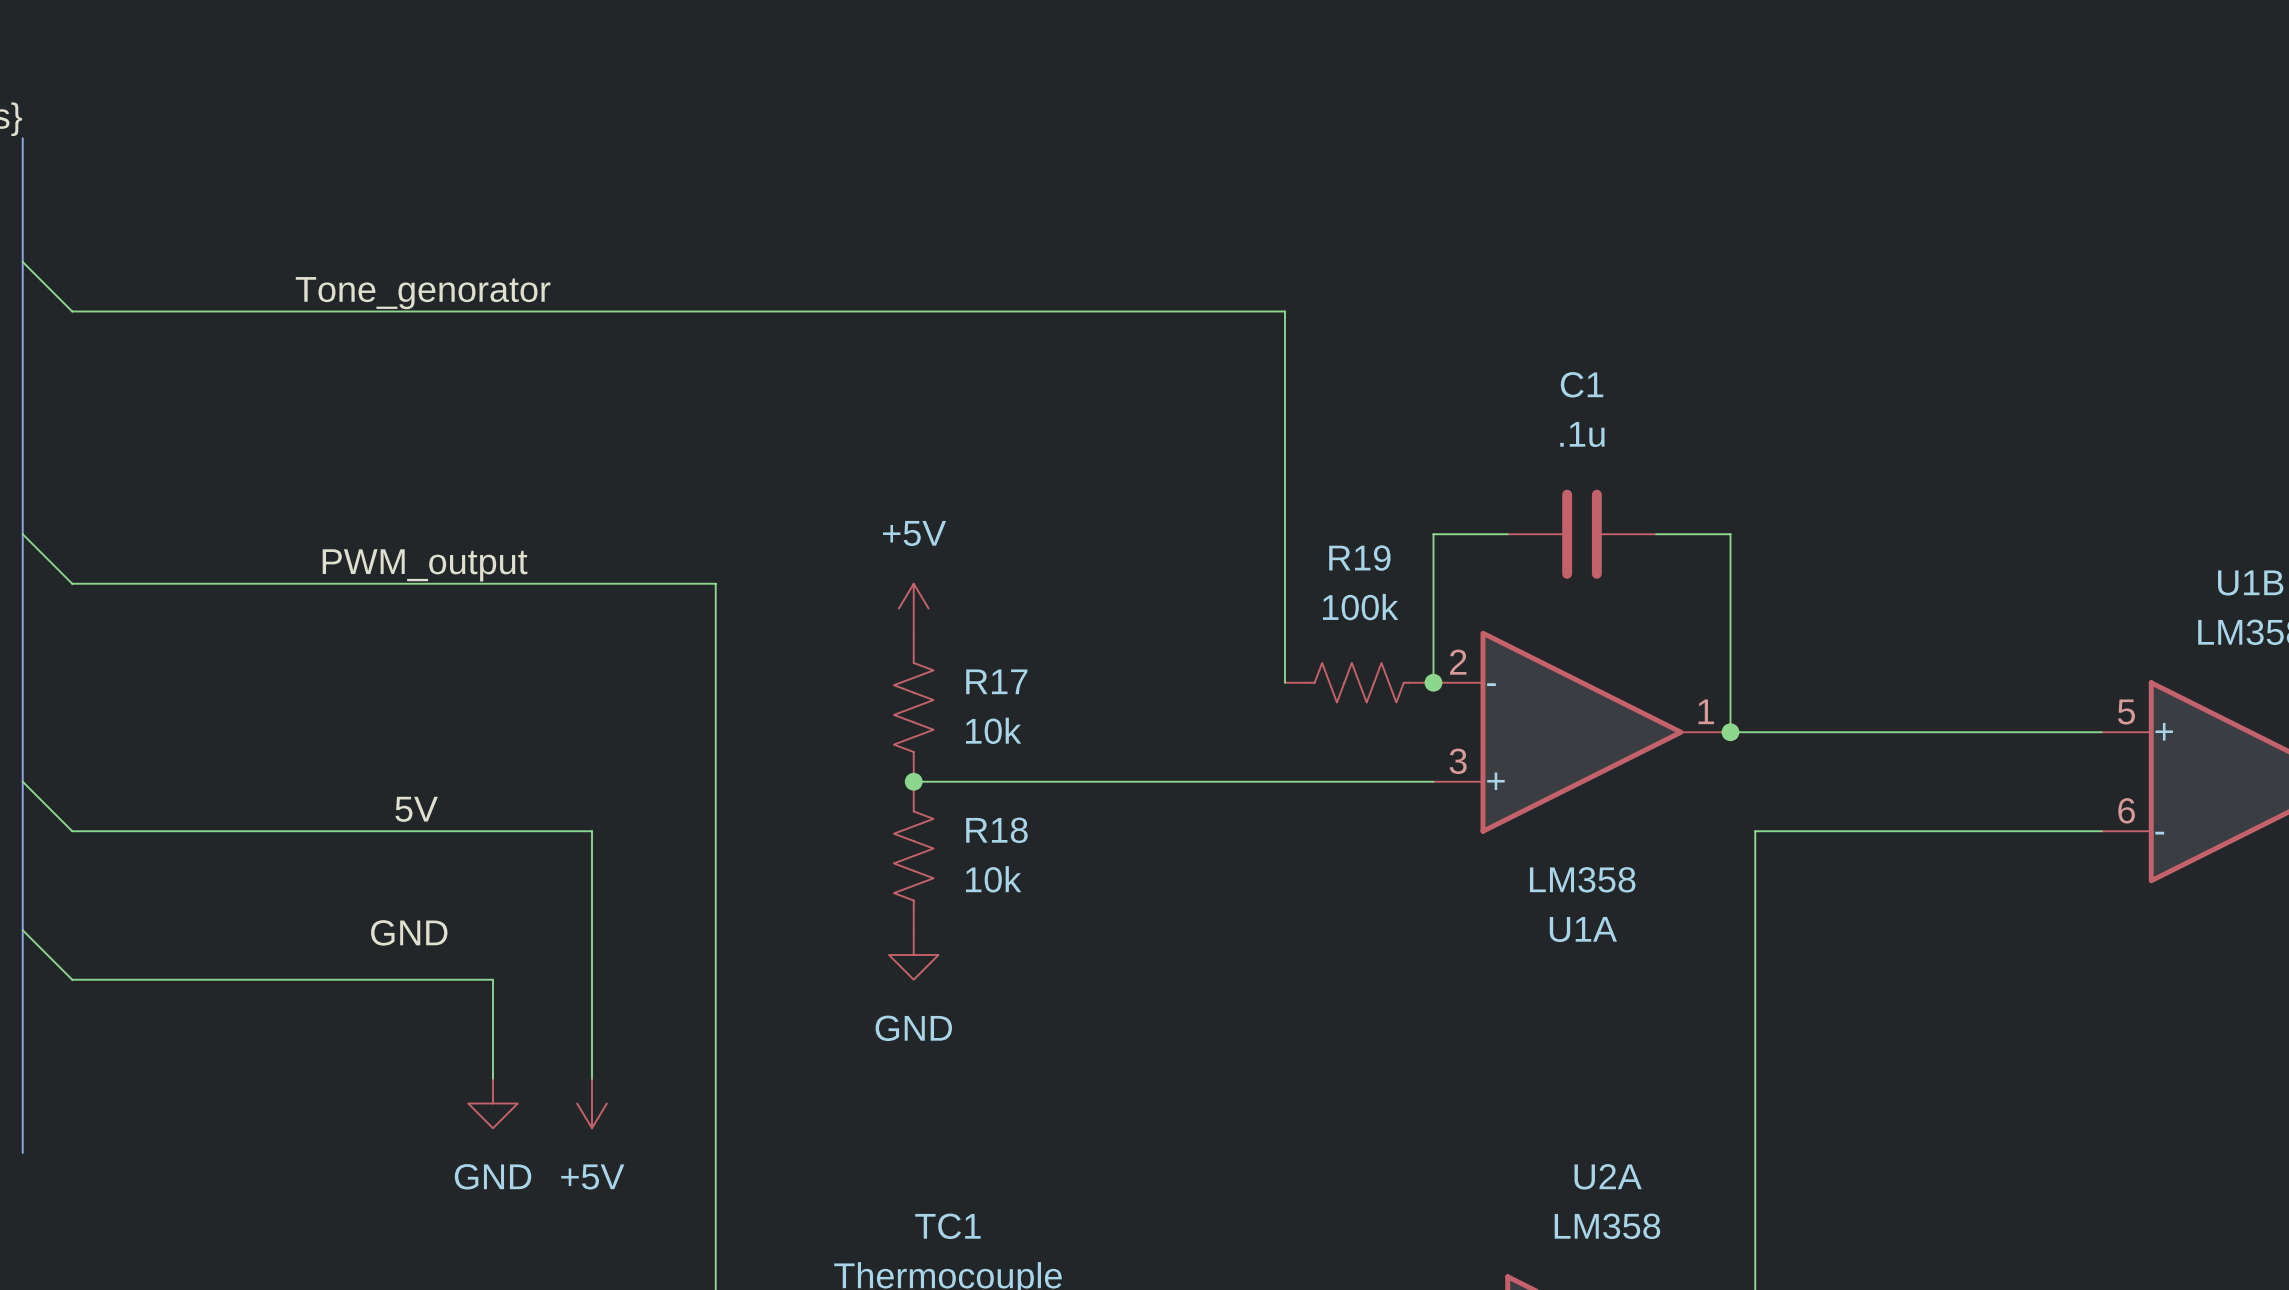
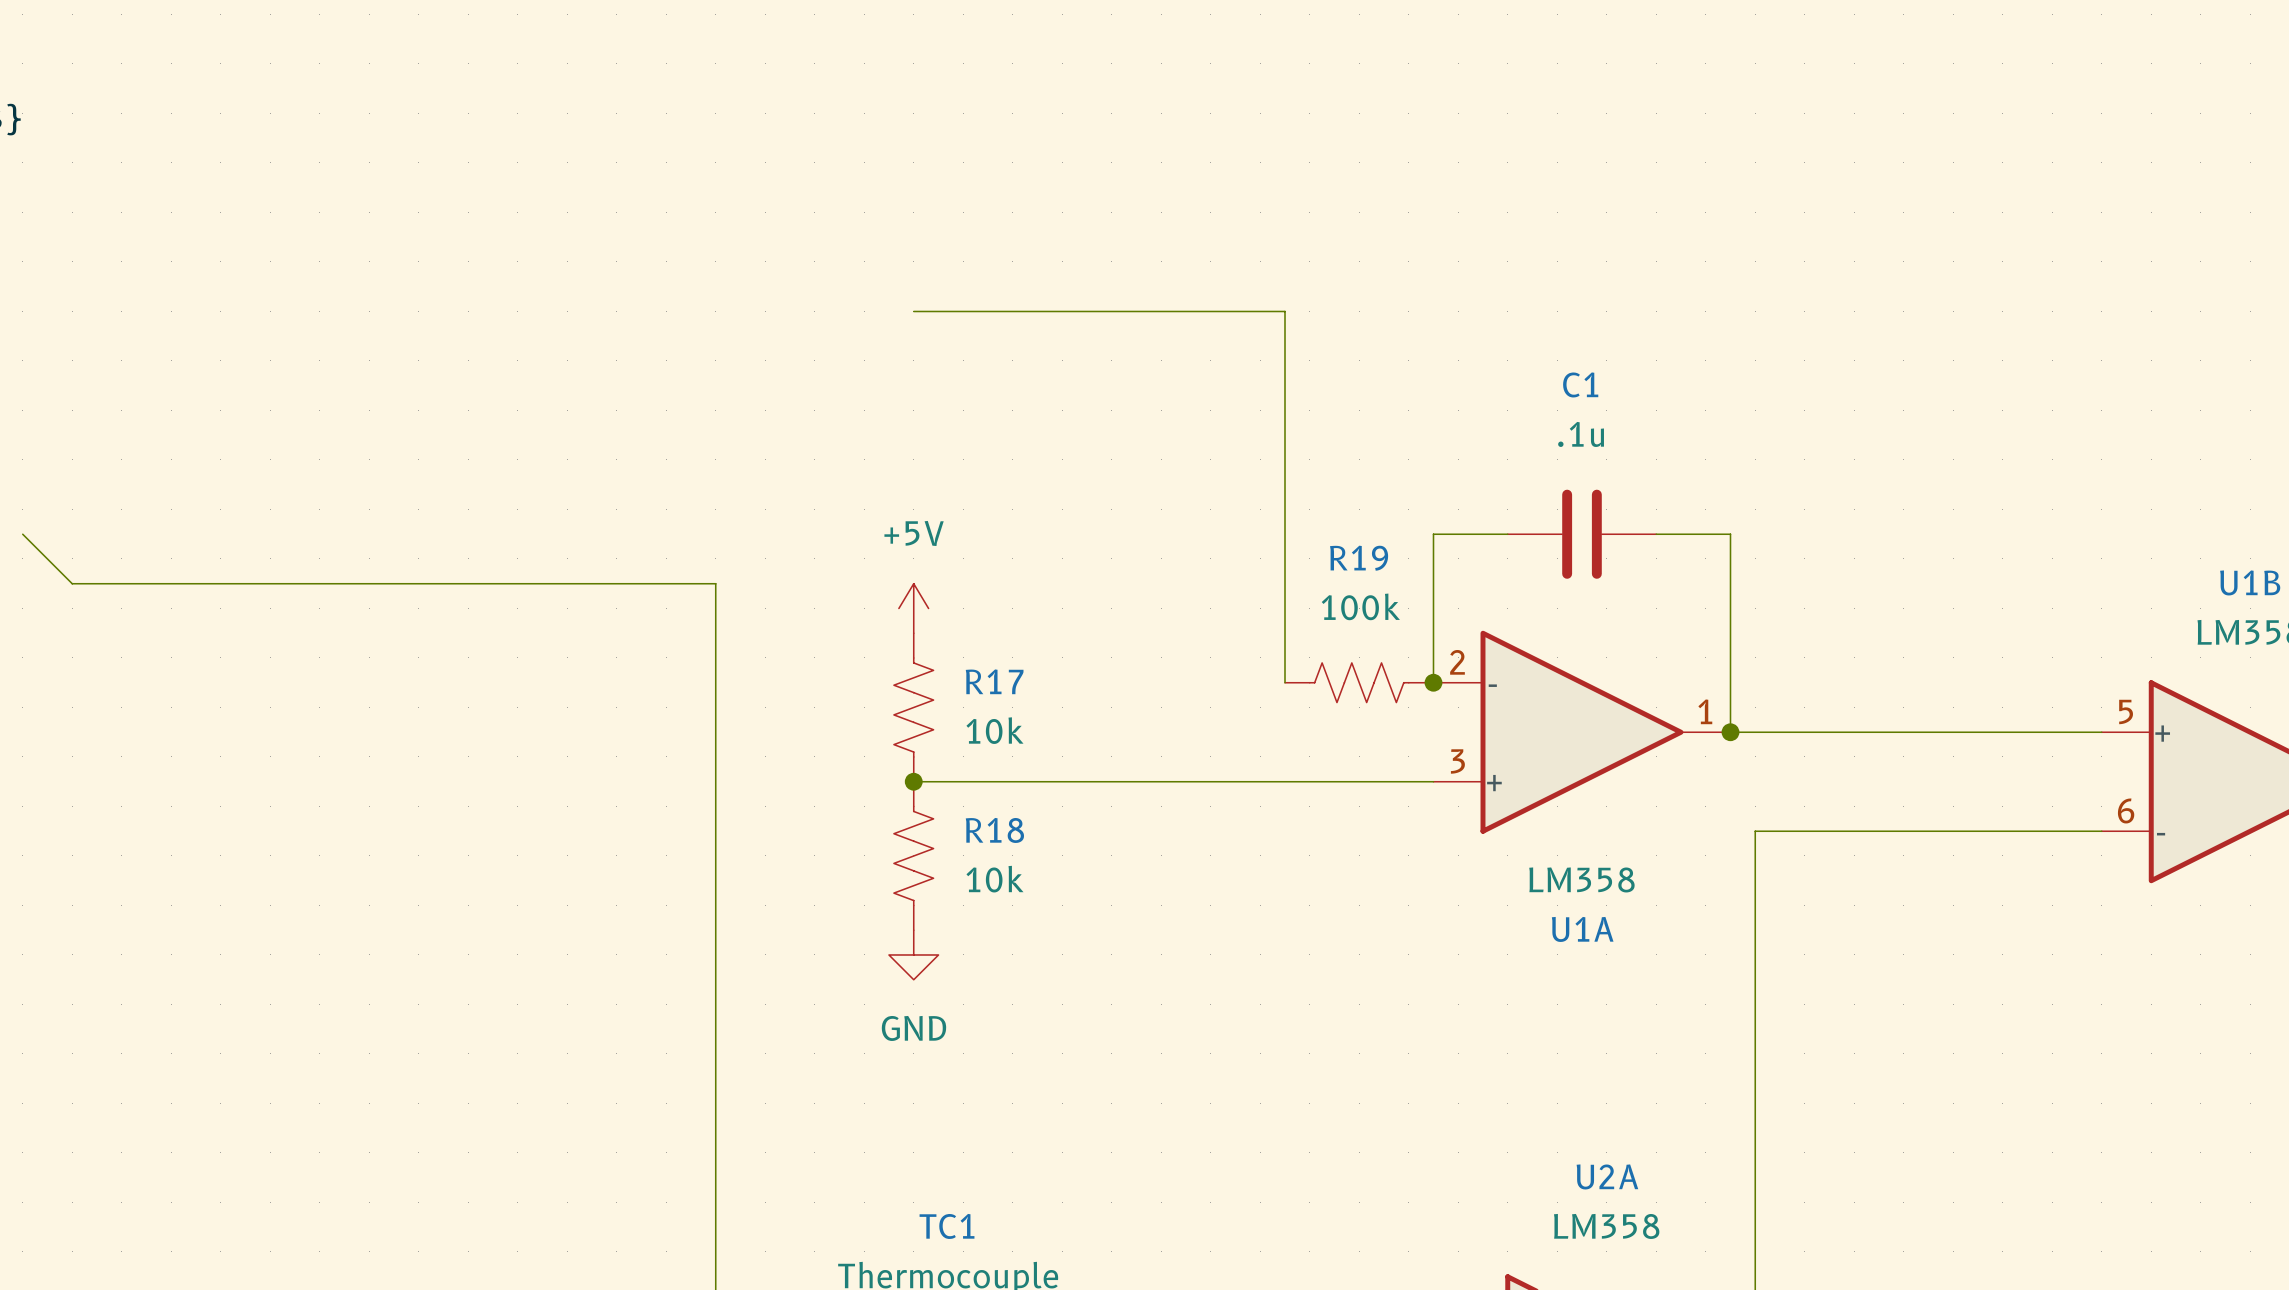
bus: (22, 138) (22, 1152) -> none
wire: (22, 261) (72, 311) (913, 311) -> none
label: Tone_genorator (423, 293) -> none
label: PWM_output (425, 565) -> none
wire: (22, 781) (72, 831) (591, 831) (591, 1078) -> none
label: 5V (416, 809) -> none
wire: (22, 930) (72, 979) (492, 979) (492, 1078) -> none
label: GND (409, 932) -> none
power symbol: GND (492, 1103) -> none
power symbol: +5V (591, 1103) -> none

